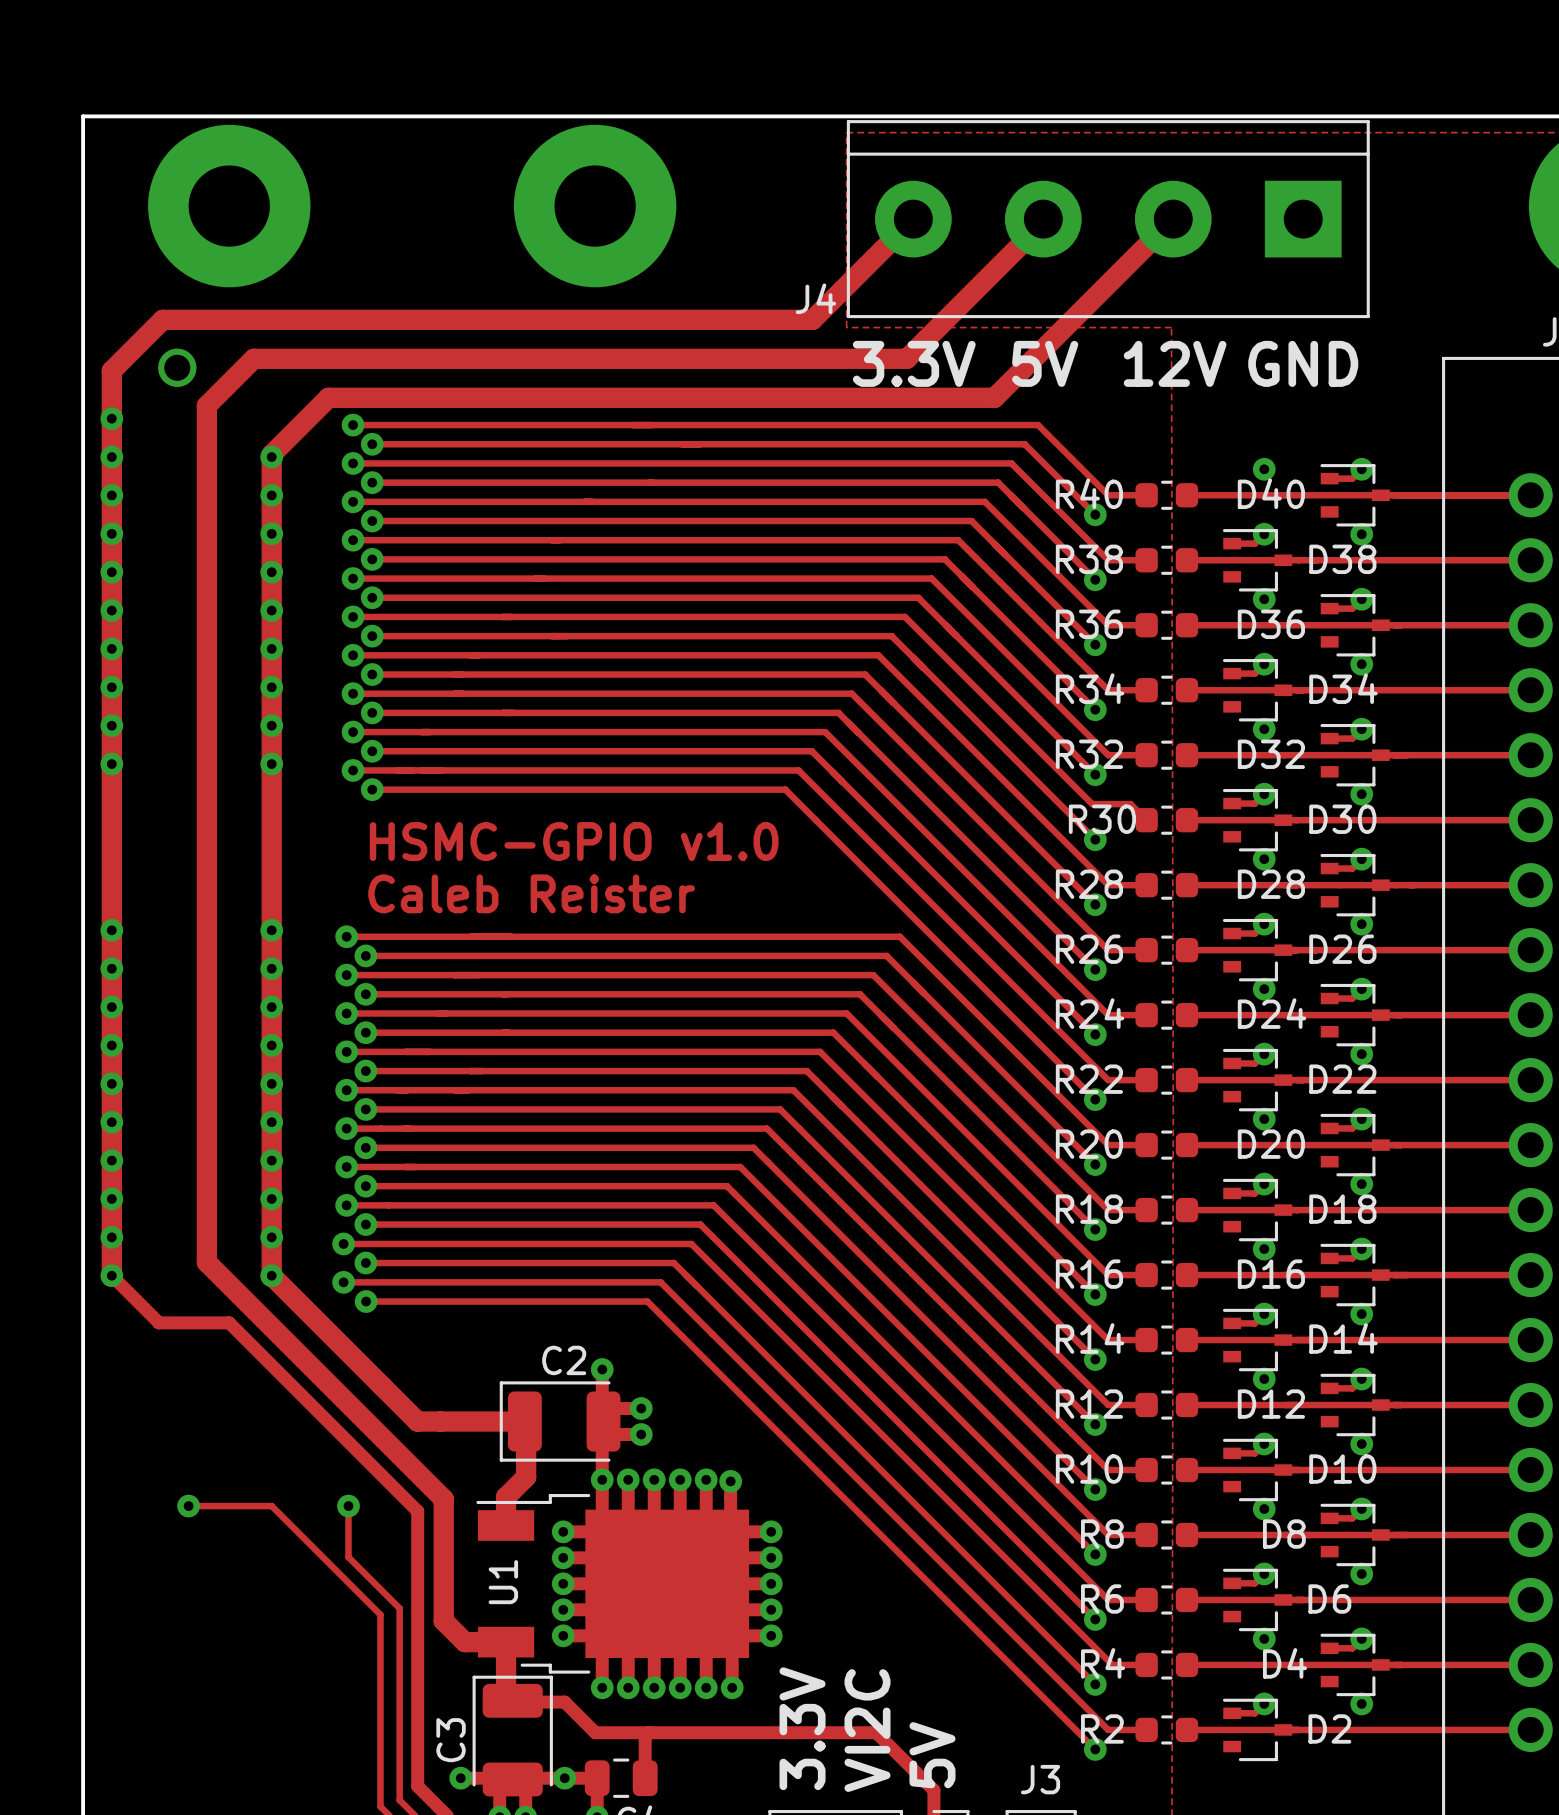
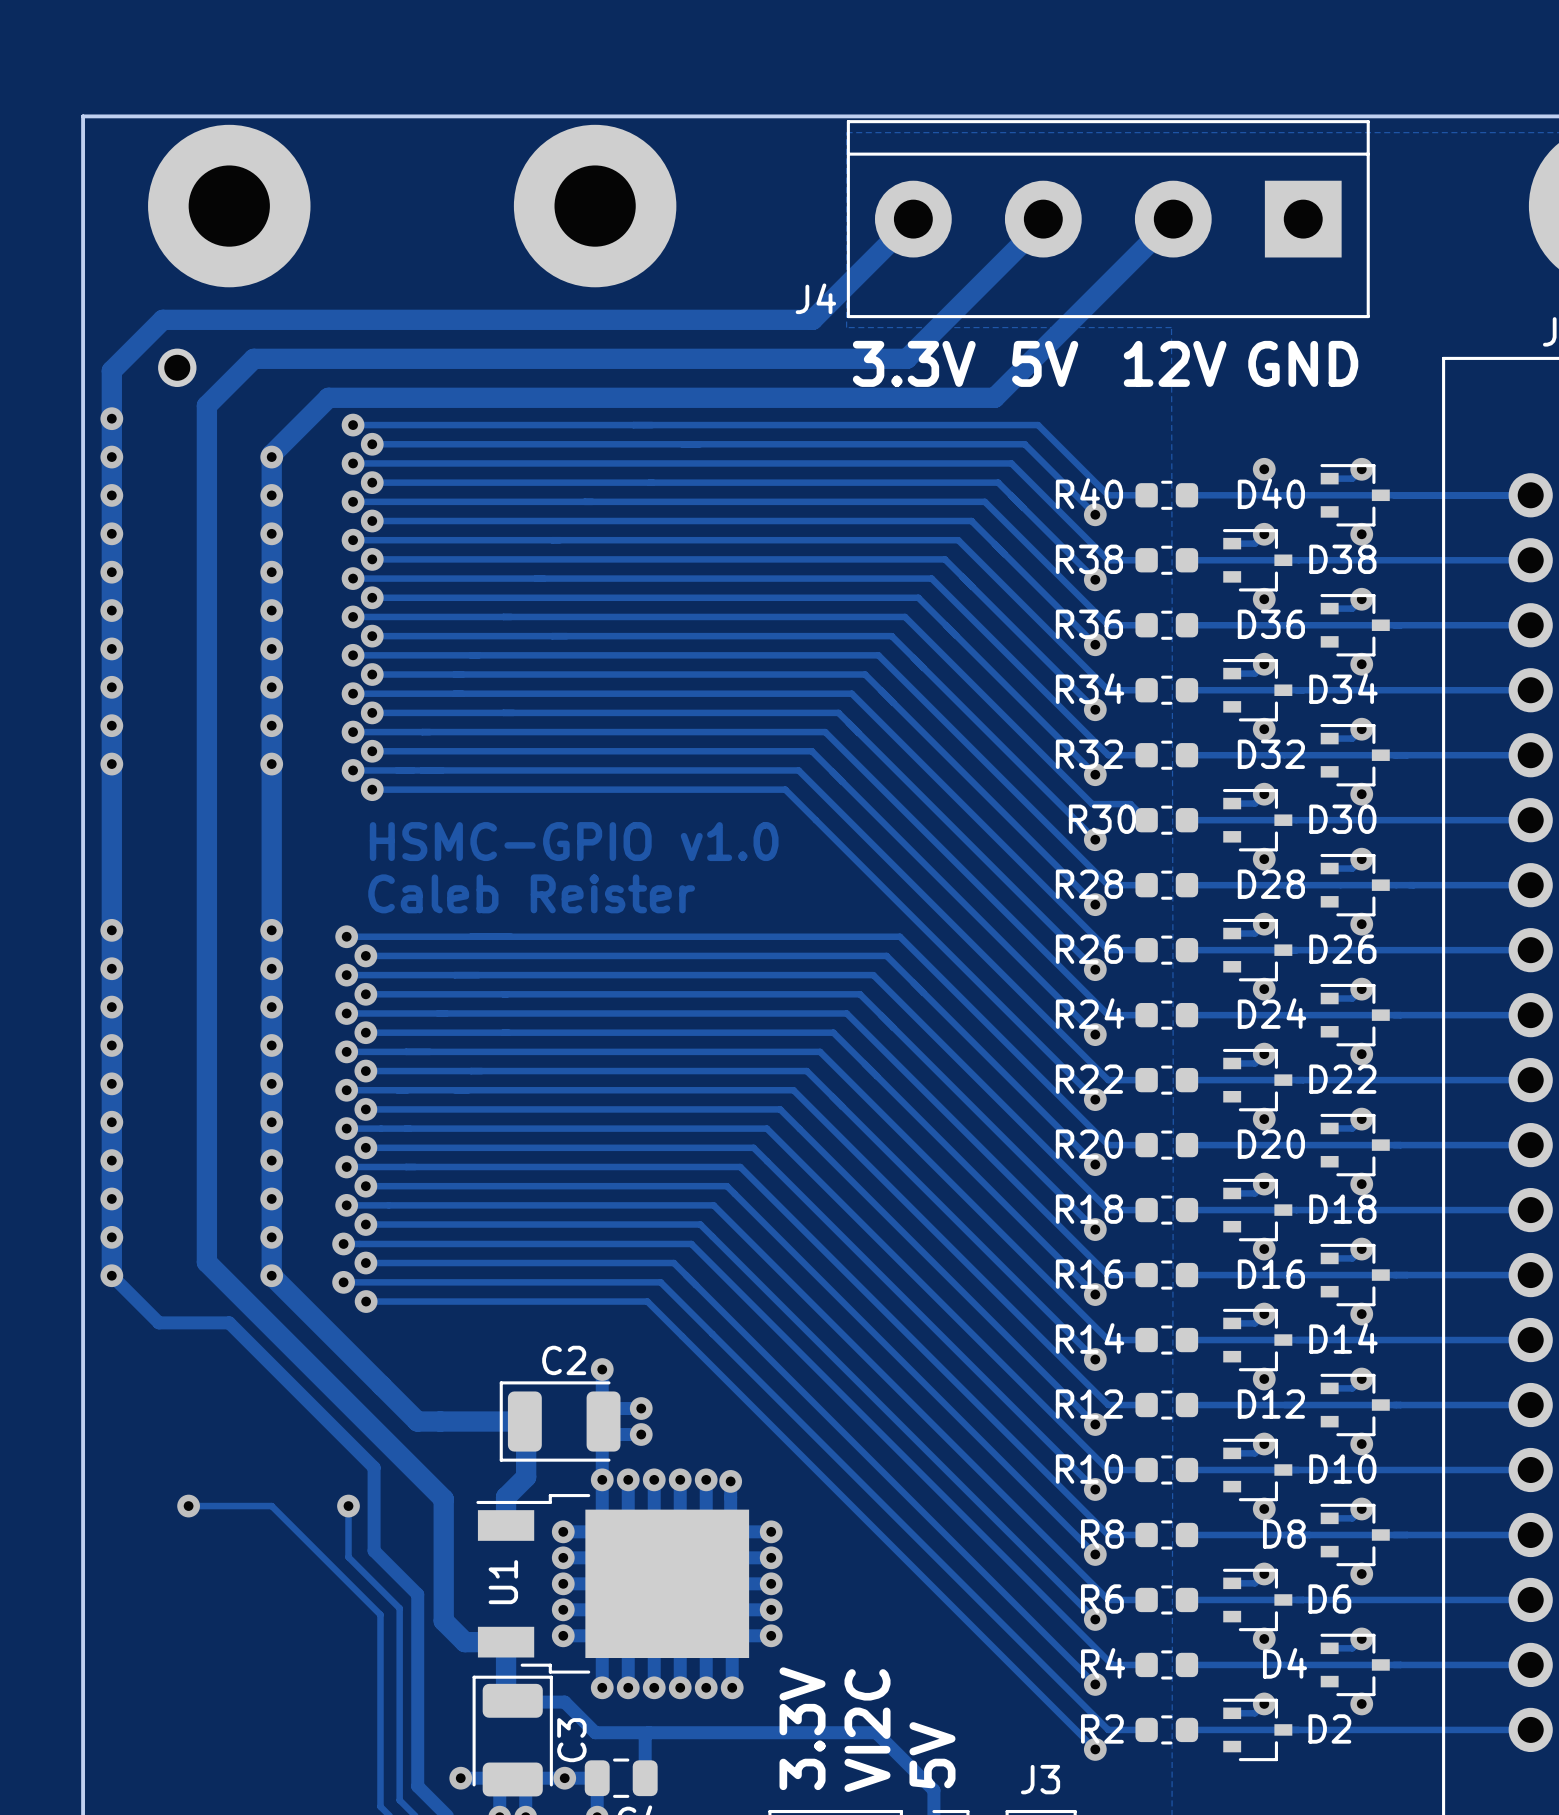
track: (374, 1467) (417, 1511) (417, 1594) -> (374, 1467) (374, 1550) (417, 1594)
C3 name position: C3 (451, 1740) -> C3 (571, 1740)

